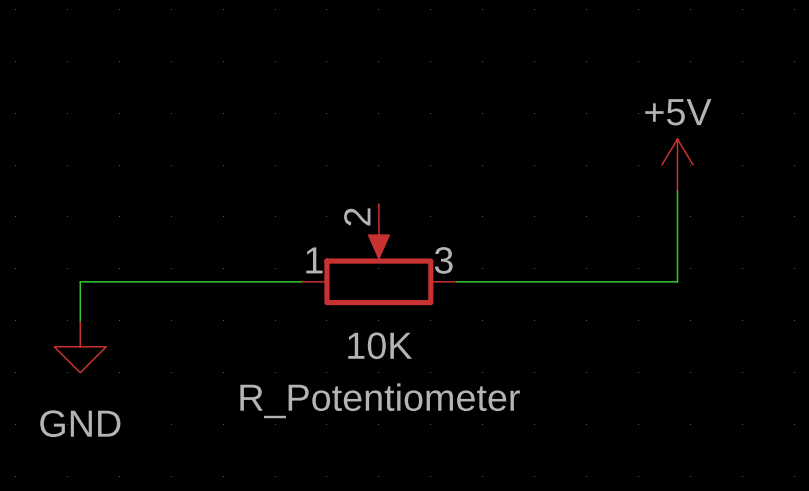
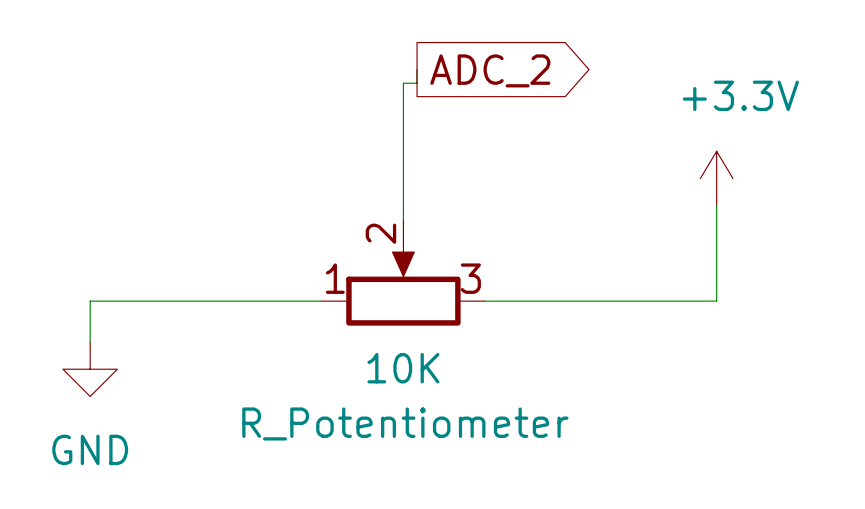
wire: none -> (417, 69) (417, 83) (403, 83) (403, 219)
global label: none -> ADC_2 (490, 70)
power symbol: +5V (677, 165) -> +3.3V (716, 178)

